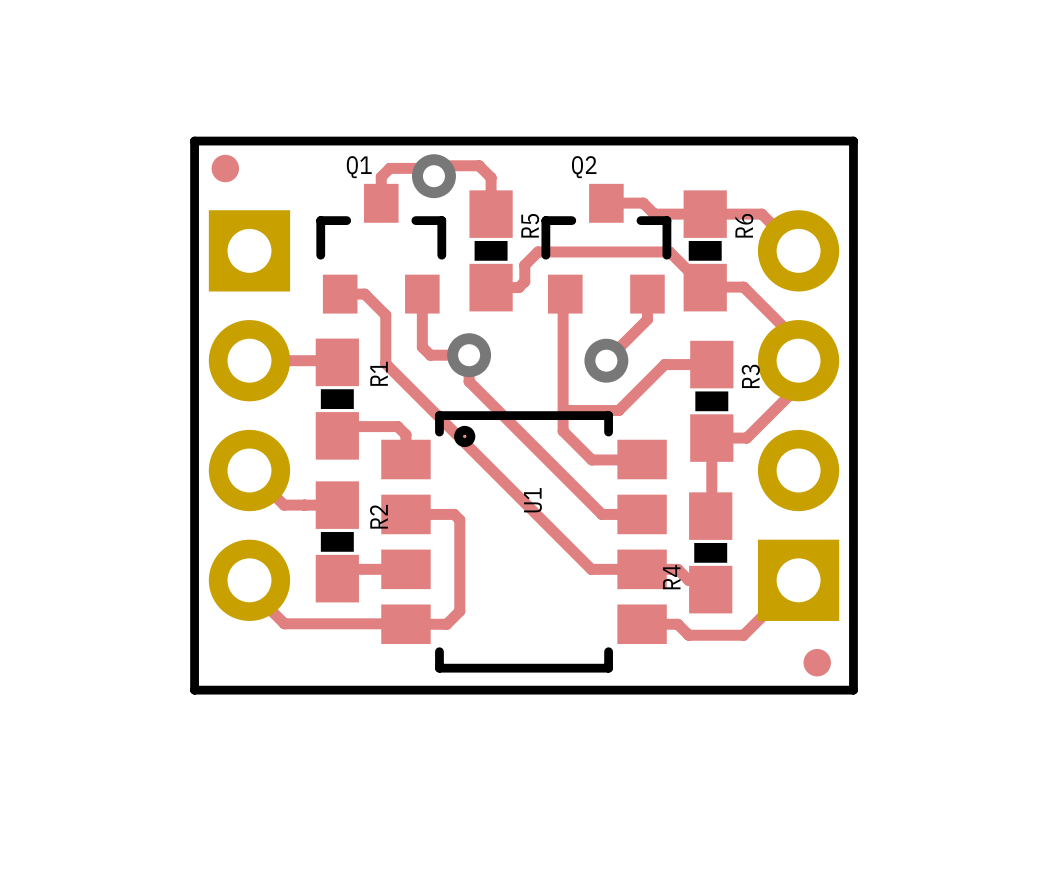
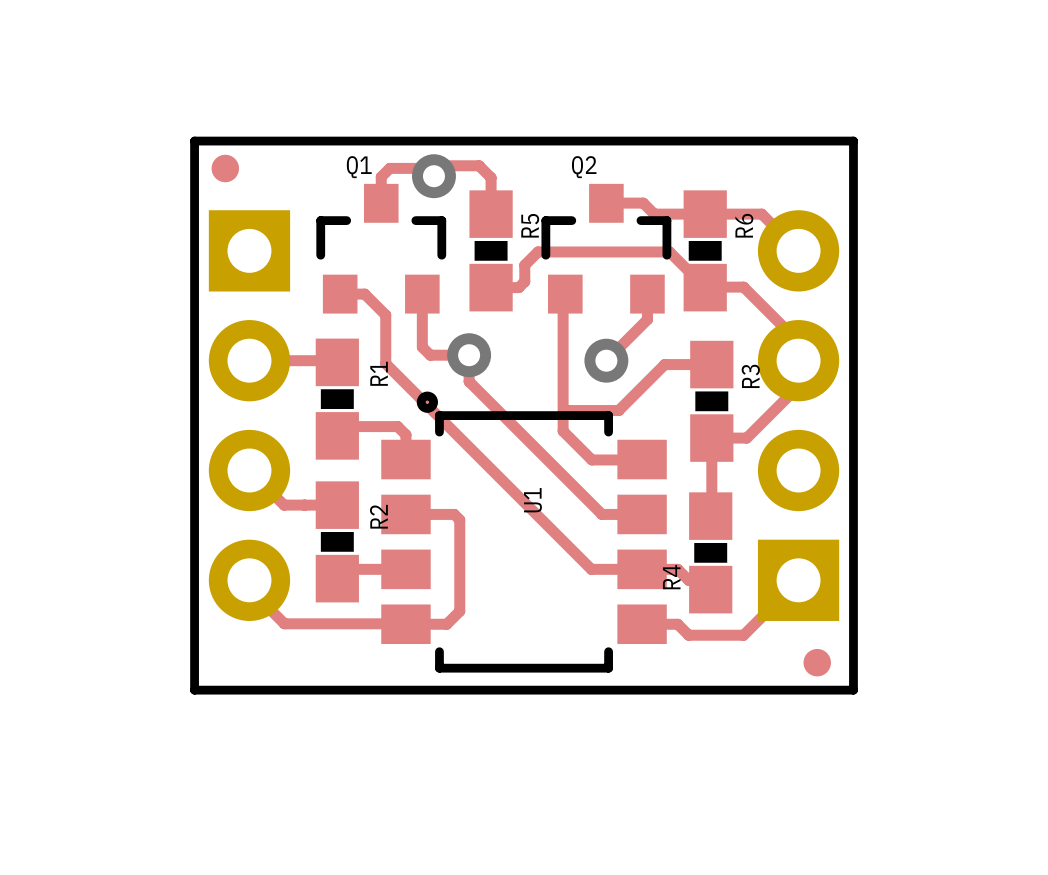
U1 footprint: [381, 411, 667, 673] -> [381, 391, 667, 673]

